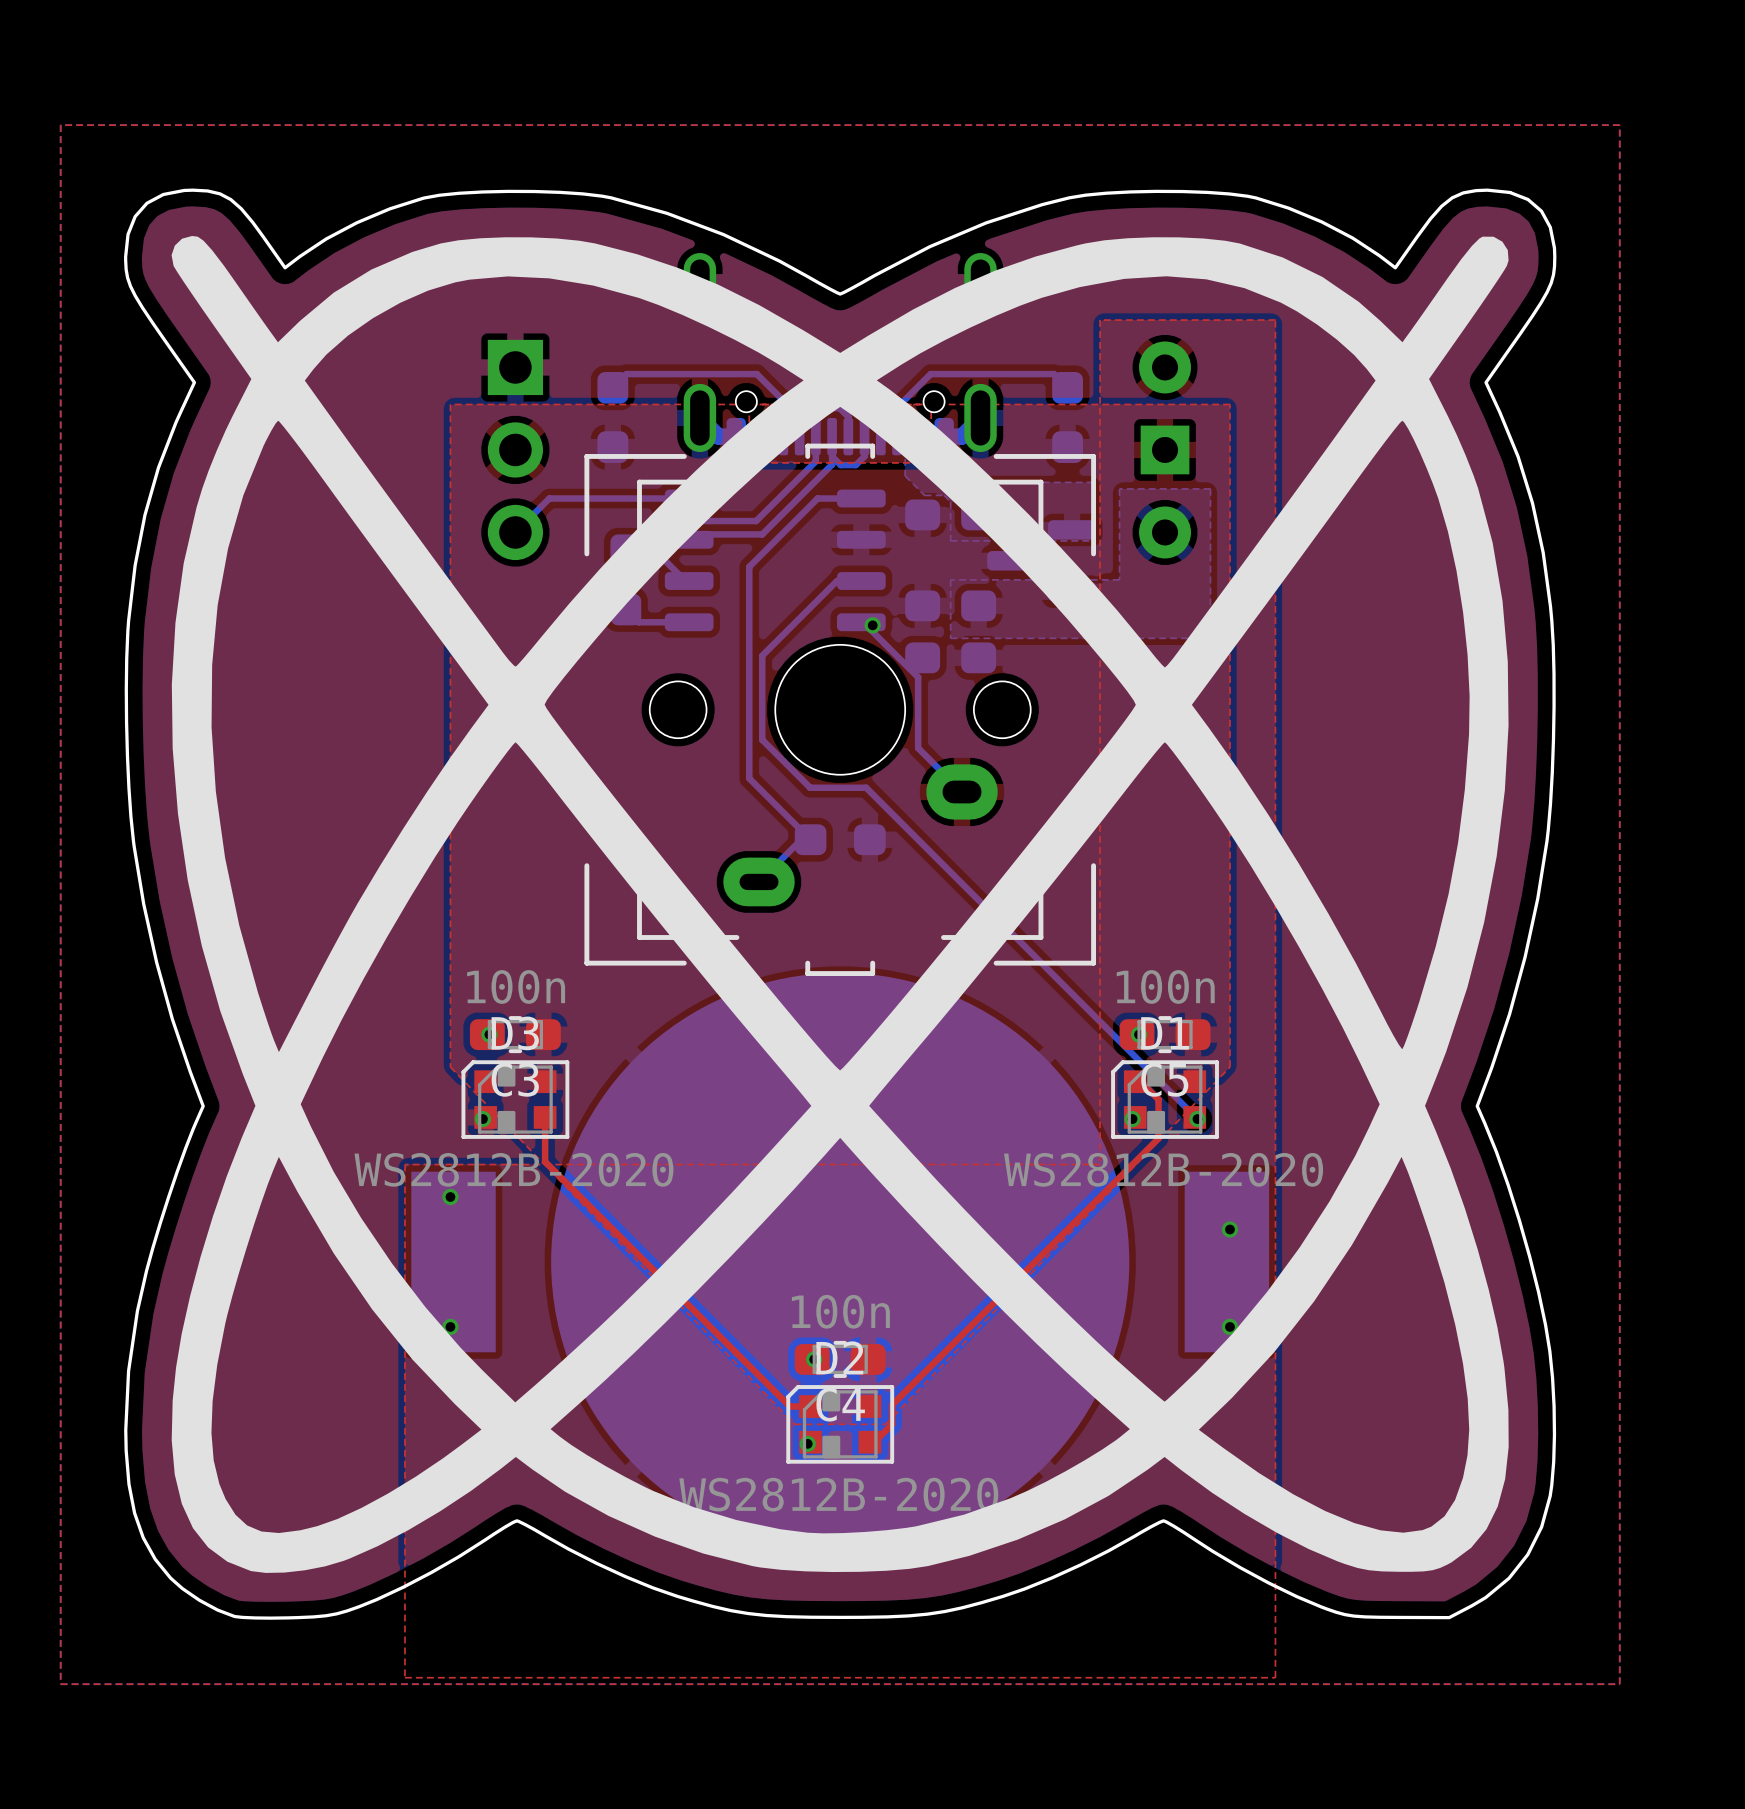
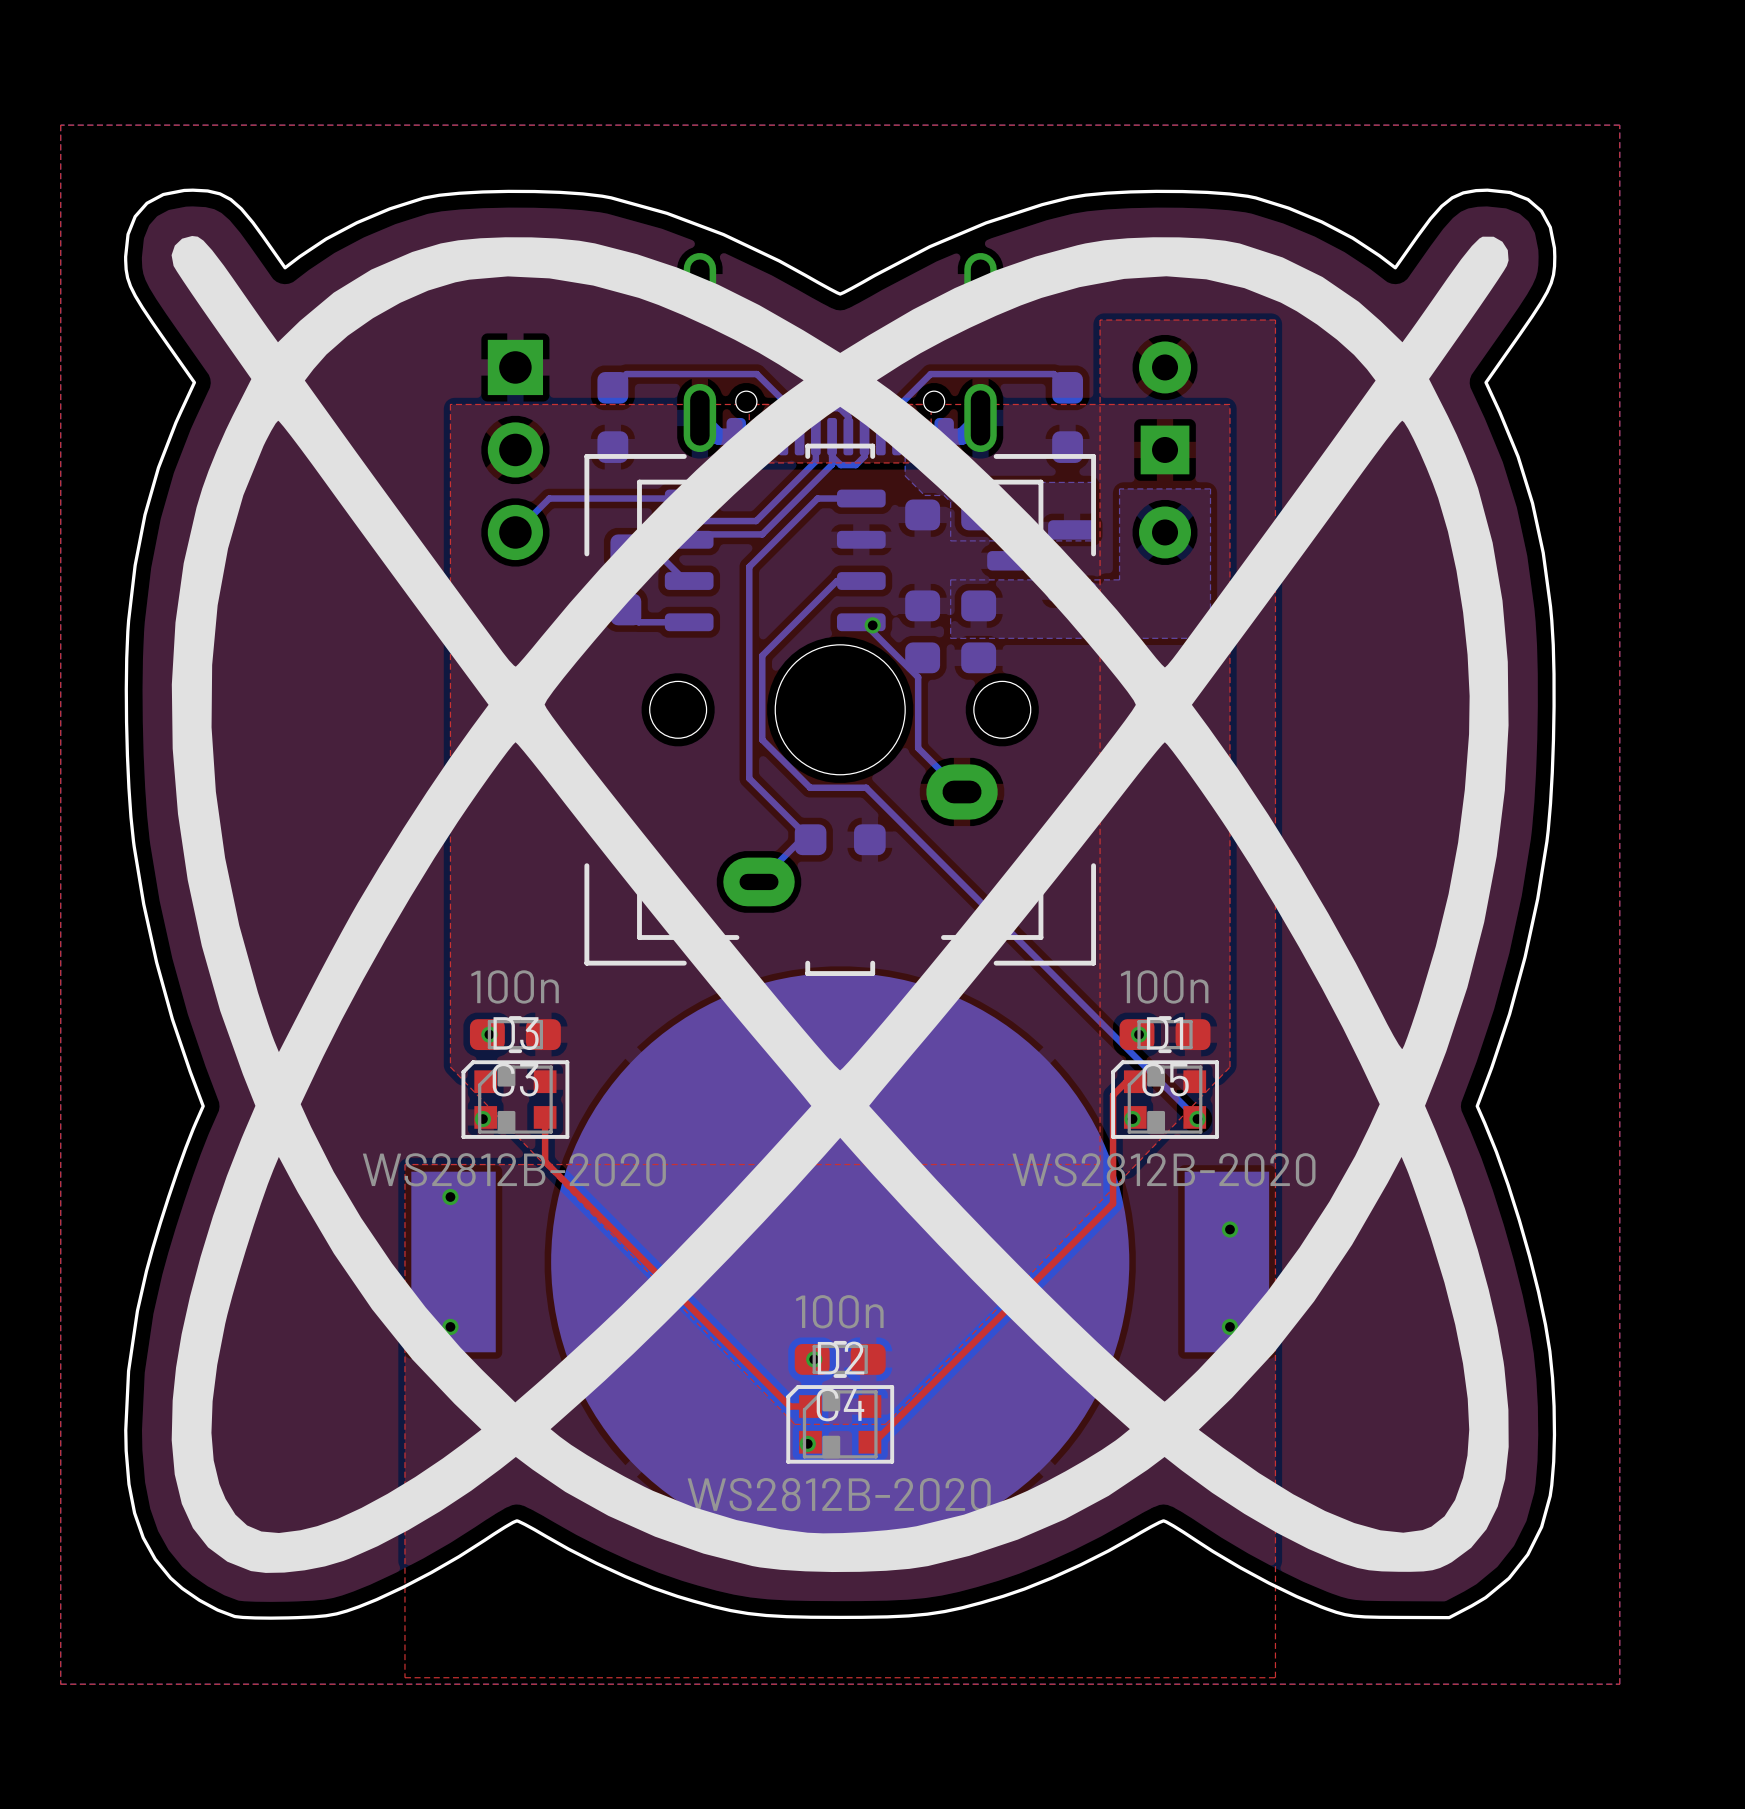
top track: (1135, 1081) (1140, 1081) (1158, 1099) (1158, 1138) (892, 1404) (892, 1424) -> (1130, 1086) (1135, 1081) (1126, 1081) (1113, 1095) (1113, 1203) (892, 1424)

